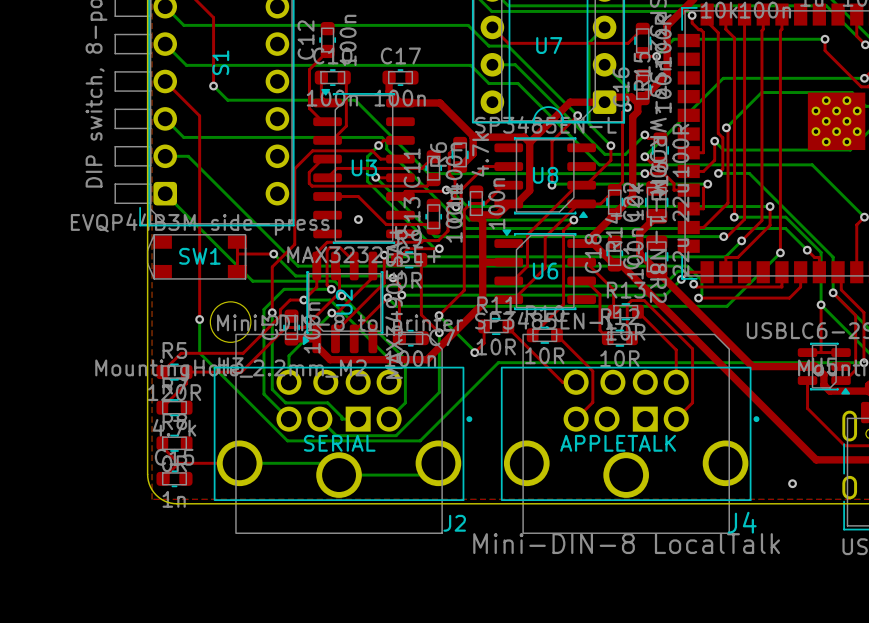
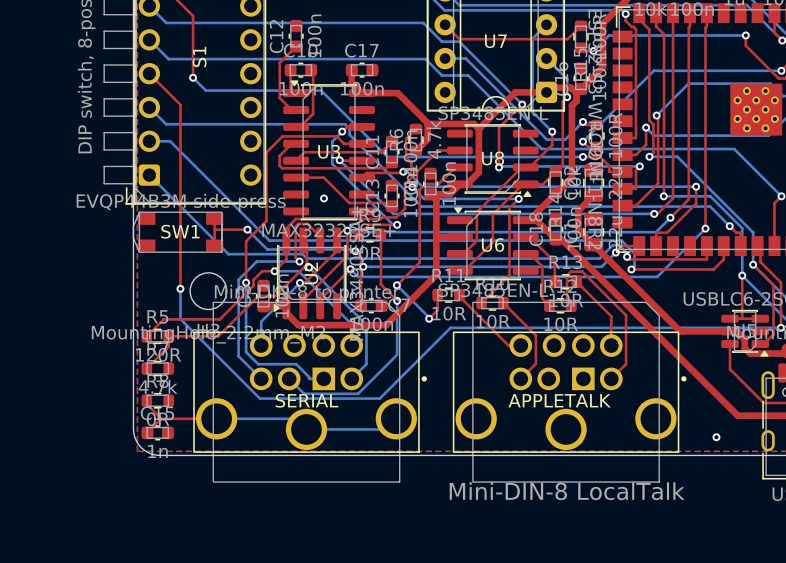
J4 name: J4 (742, 522) -> none
J2 name: J2 (454, 523) -> none

